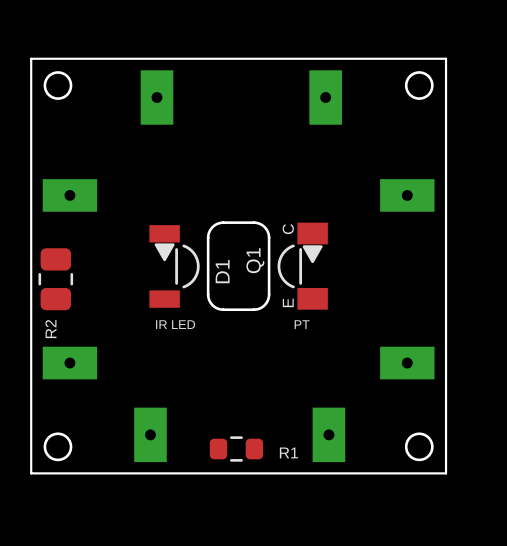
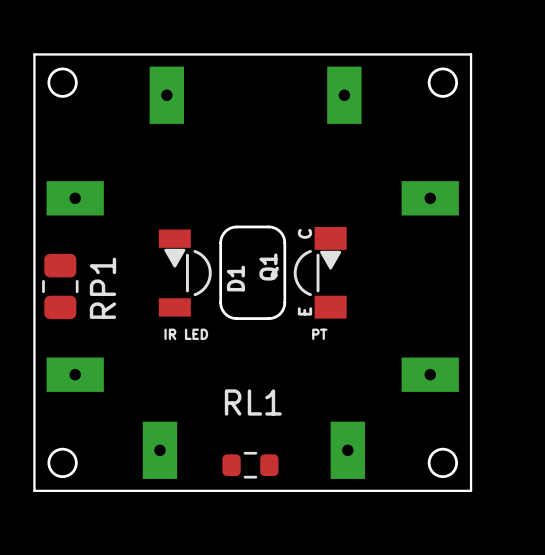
R2 name: R2 (50, 329) -> RP1 (102, 288)
R1 name: R1 (288, 452) -> RL1 (253, 402)

